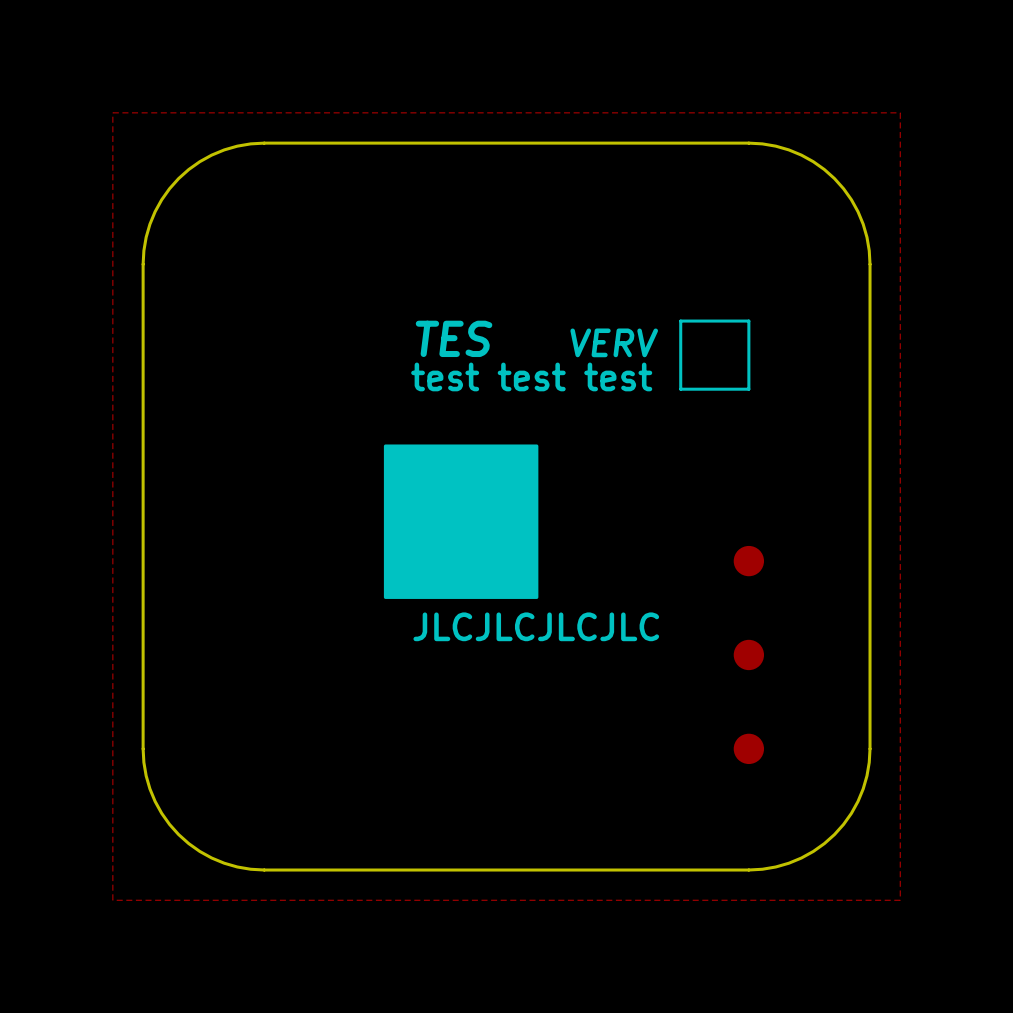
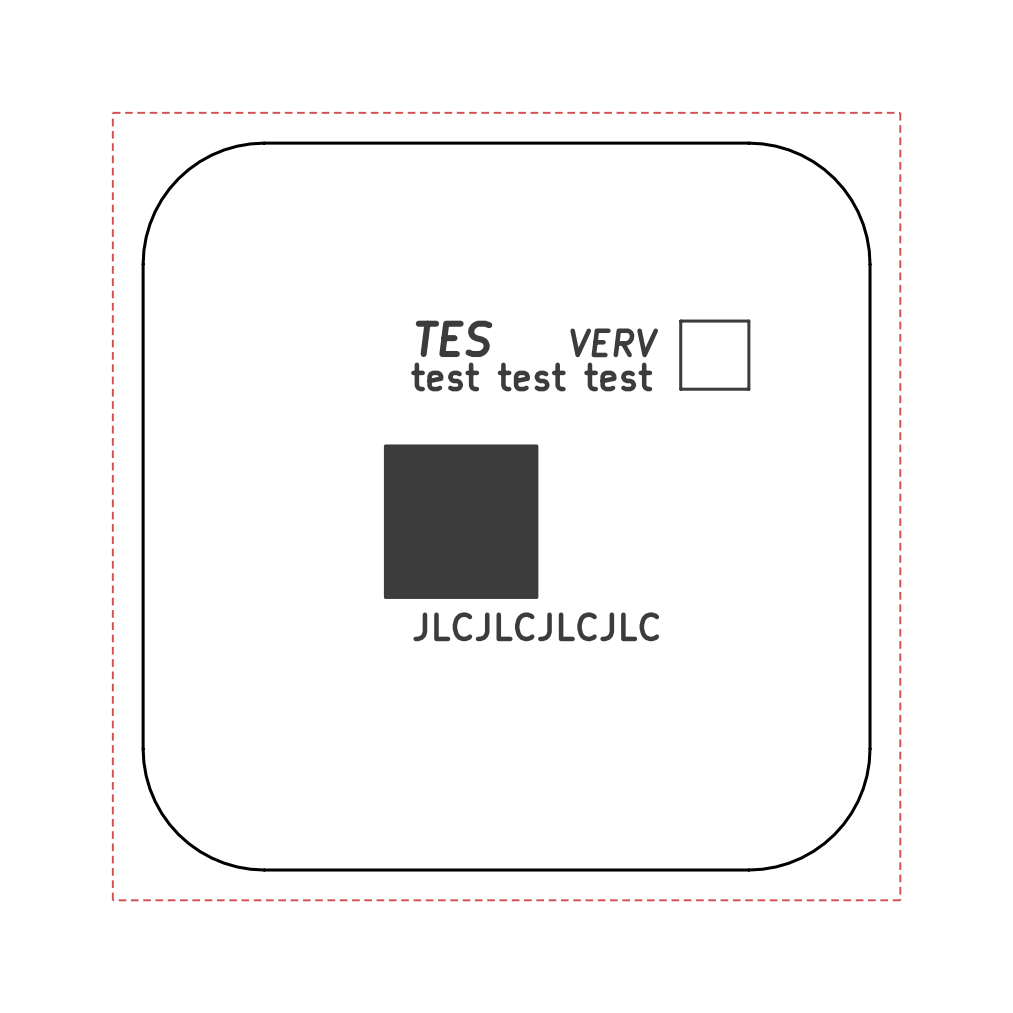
part: (748, 561) -> none
part: (748, 654) -> none
part: (748, 748) -> none

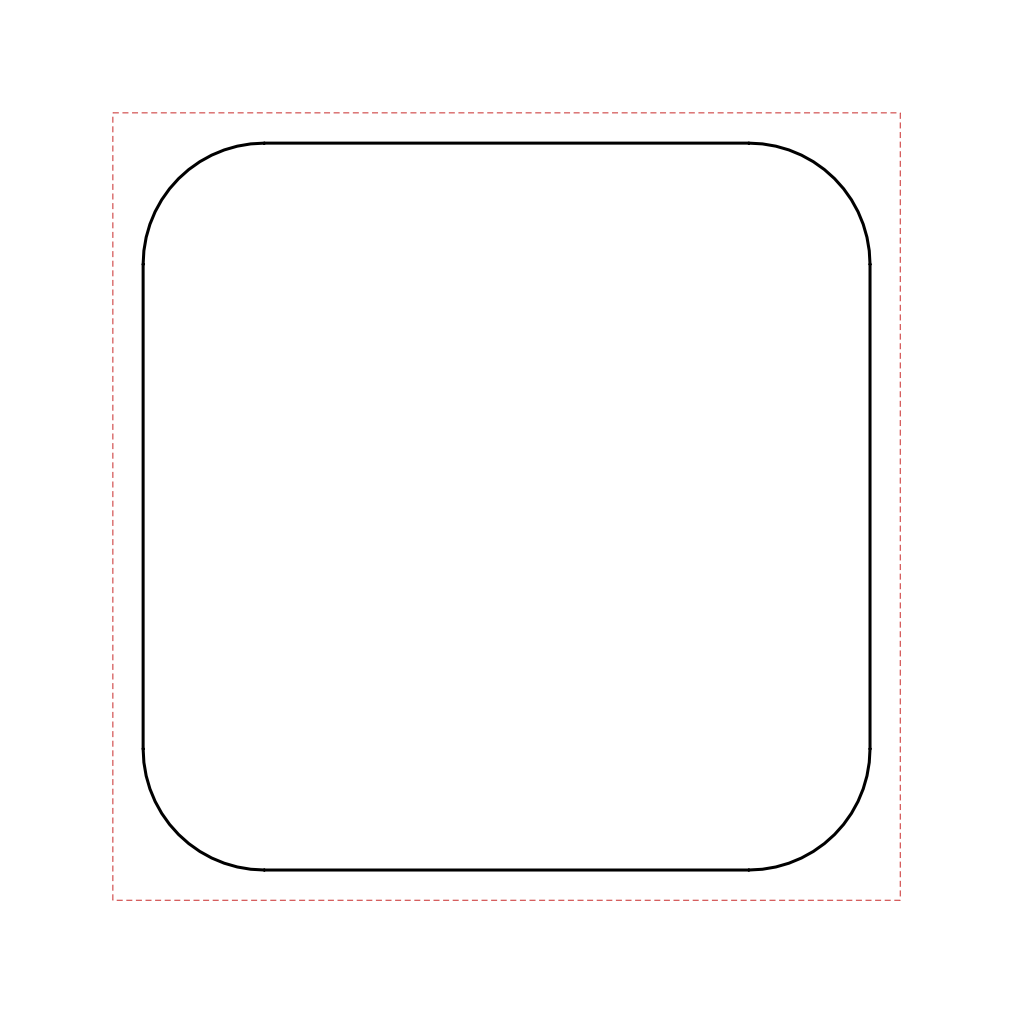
line: (680, 321) (680, 389) (748, 389) (748, 321) (680, 321) -> none
text: TES (454, 338) -> none
text: VERV (614, 342) -> none
text: test test test (531, 376) -> none
drawing: [383, 444, 539, 599] -> none
text: JLCJLCJLCJLC (536, 626) -> none

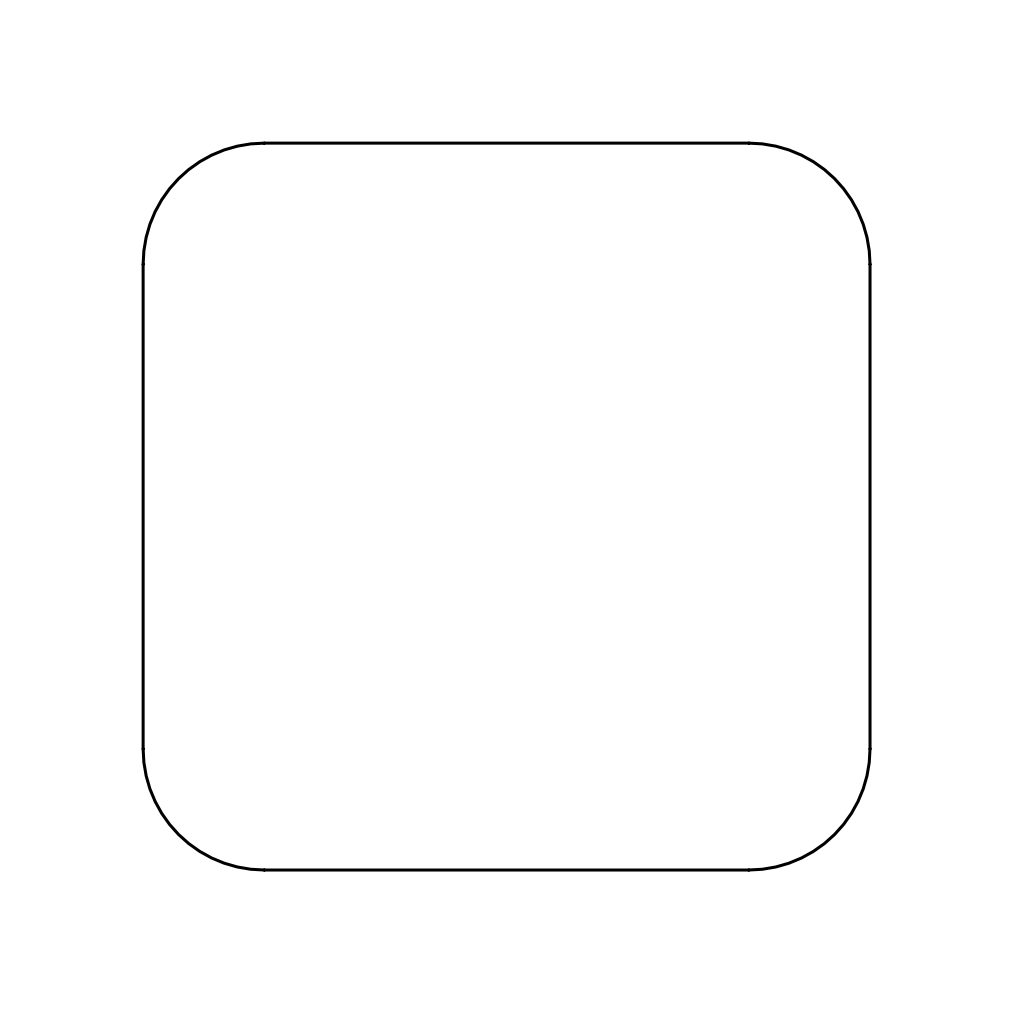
zone outline: (112, 112) (900, 112) (900, 900) (112, 900) (112, 112) -> none

